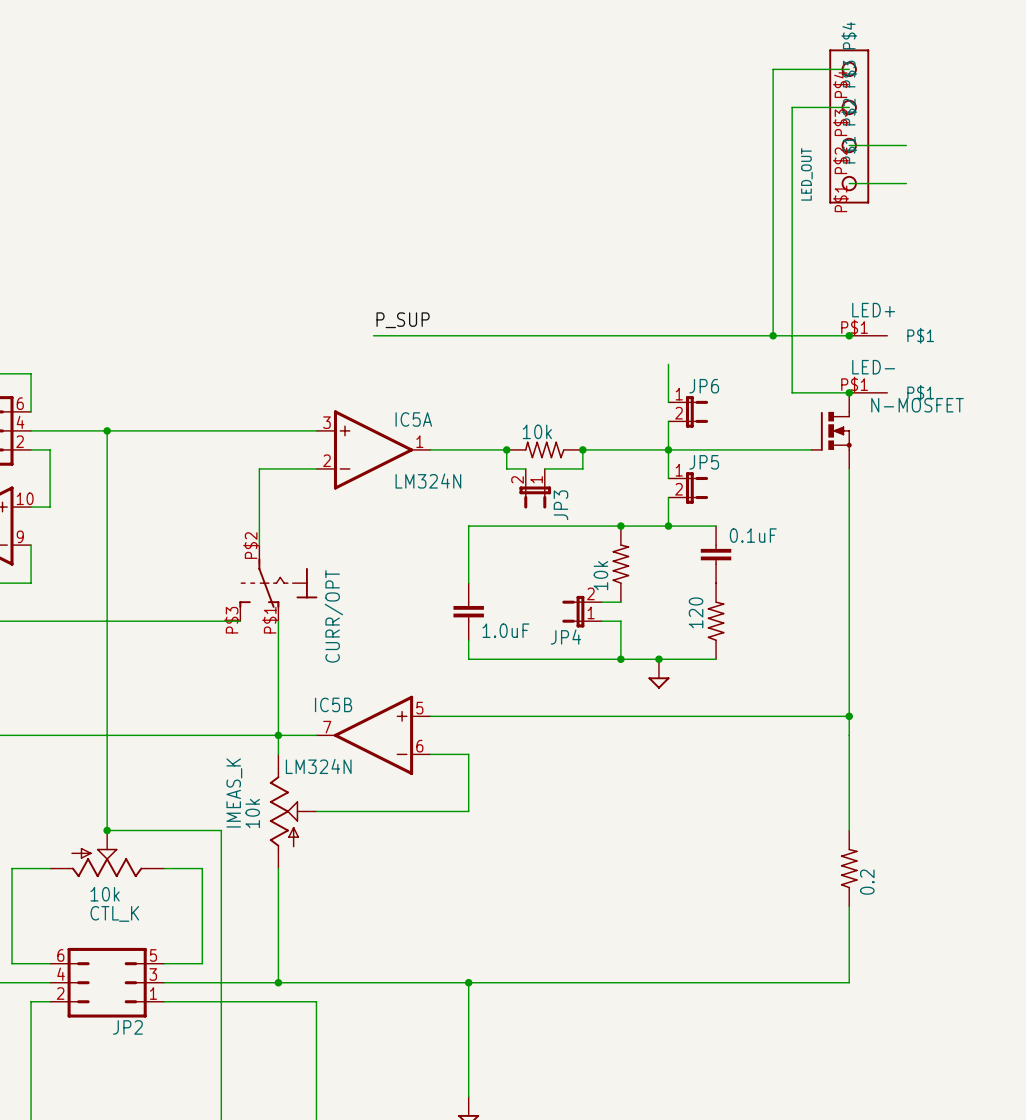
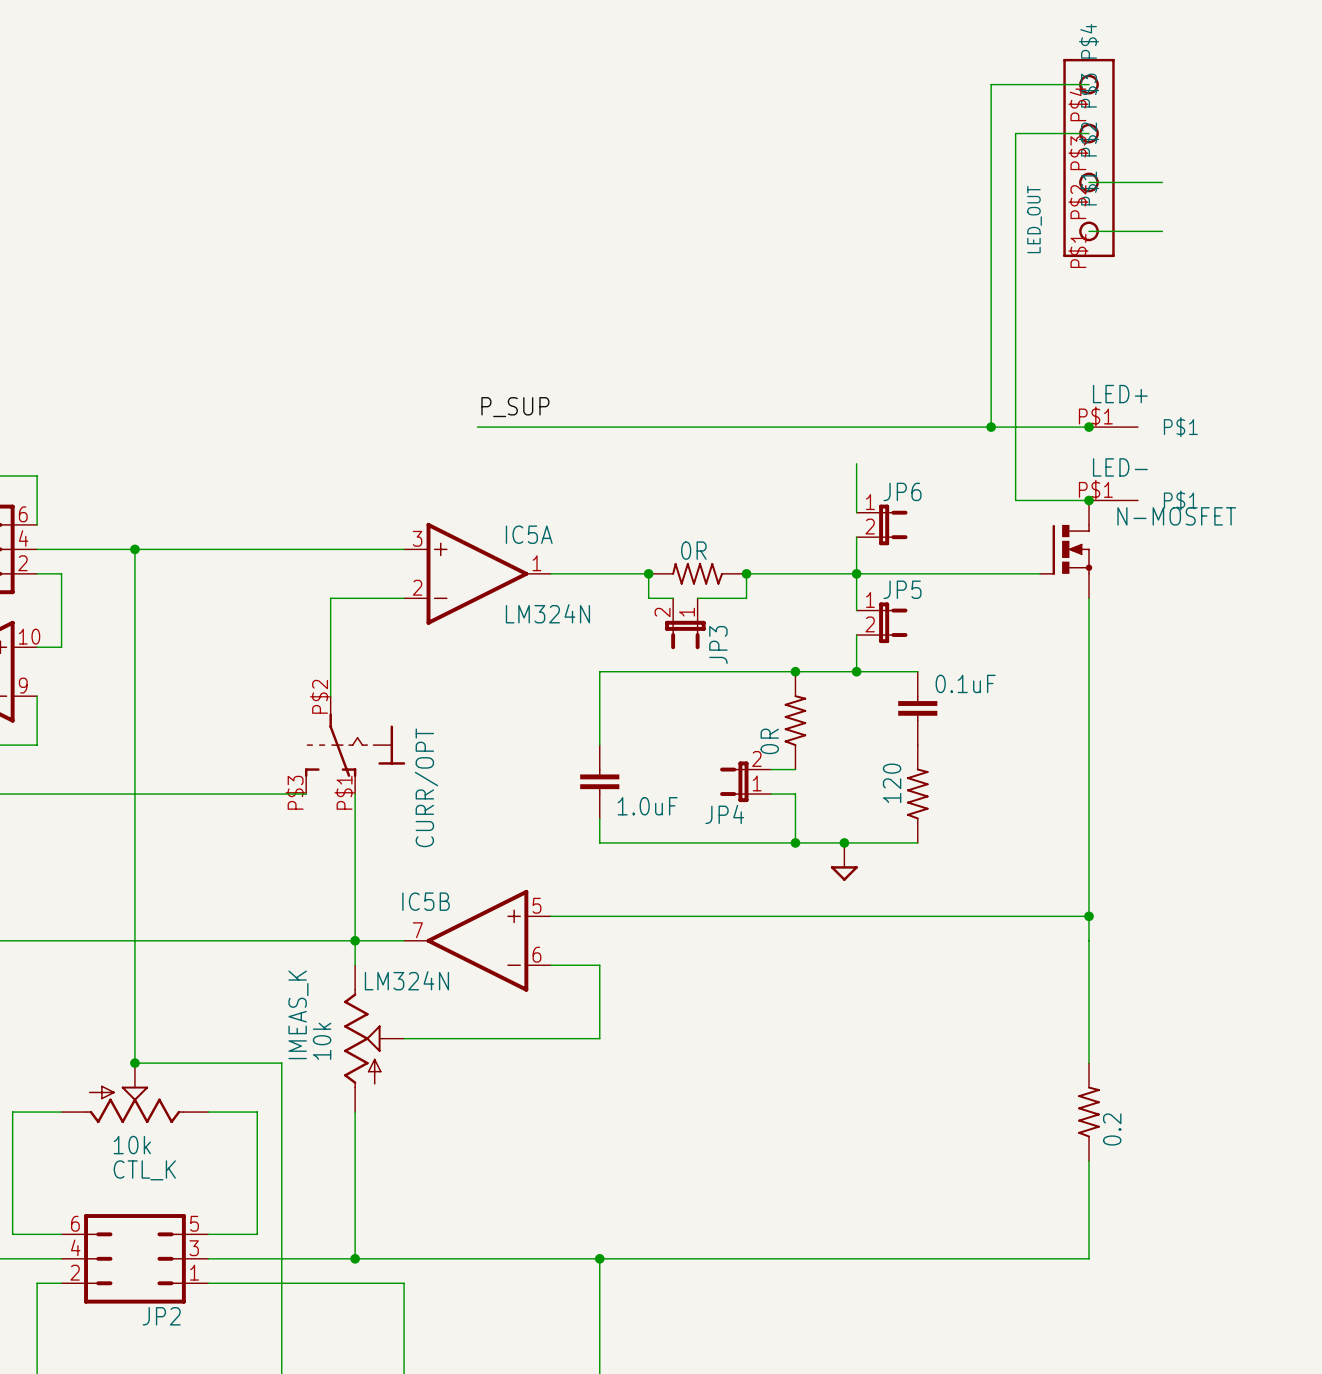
part value: 10k (537, 431) -> 0R (693, 550)
part value: 10k (600, 575) -> 0R (769, 741)

